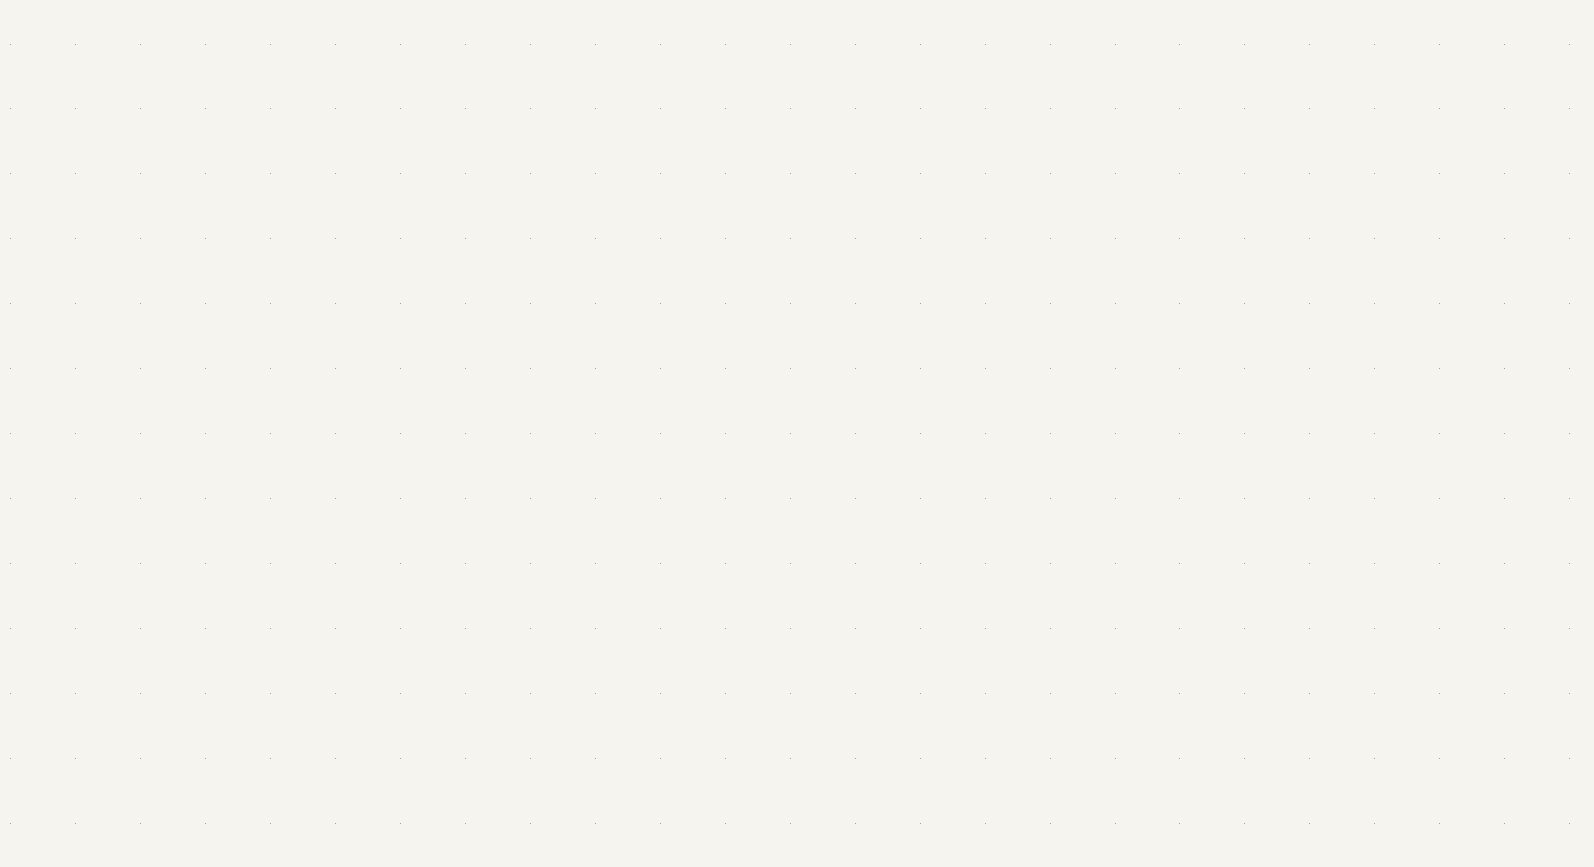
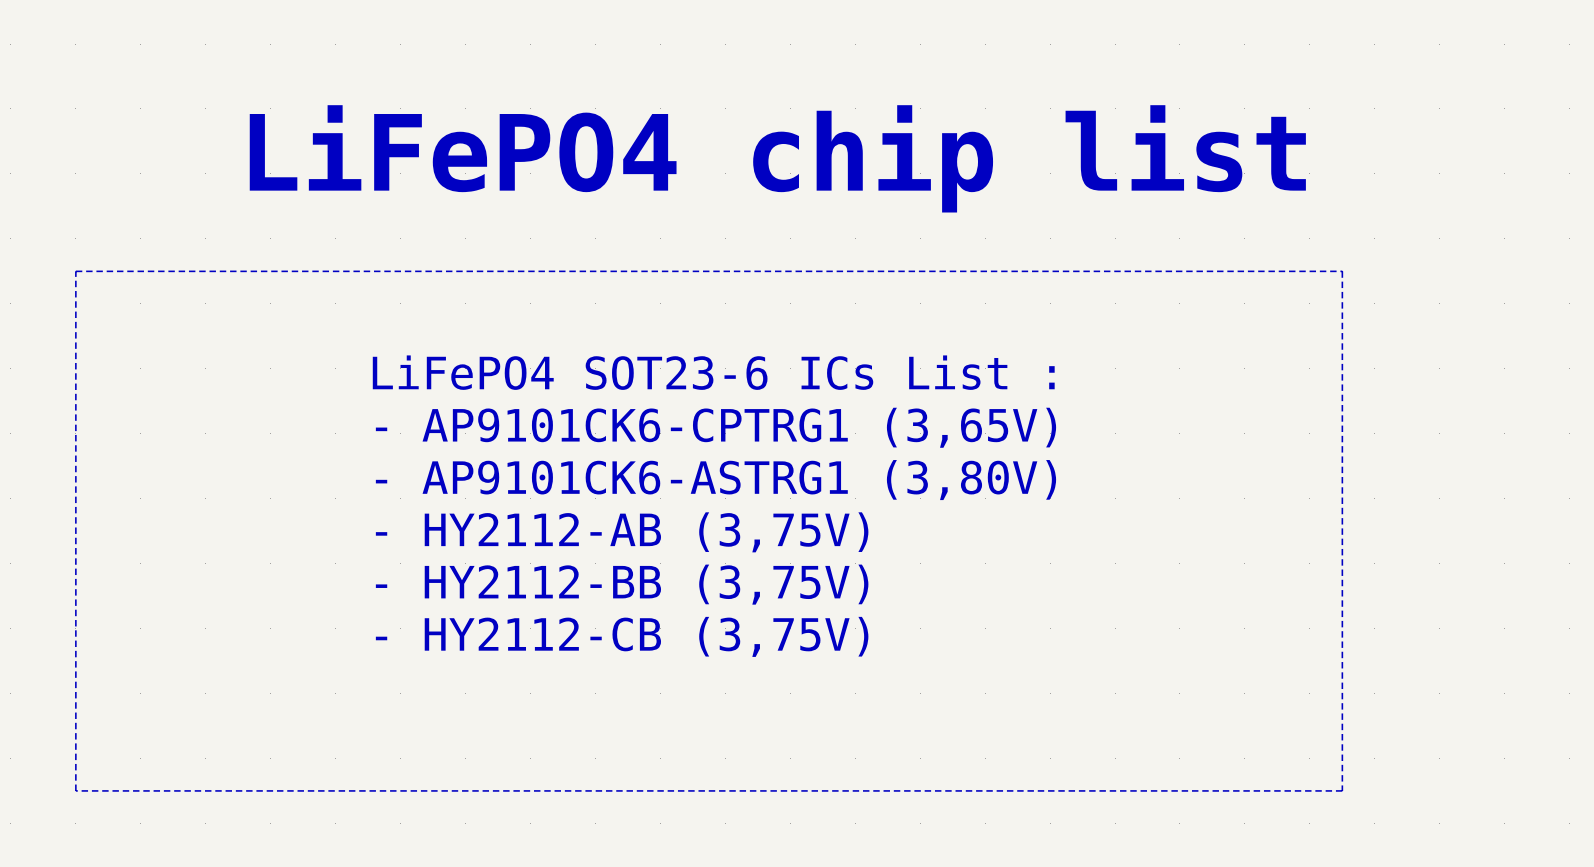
text: none -> LiFePO4 chip list (777, 158)
line: none -> (75, 271) (1342, 271) (1342, 790) (75, 790) (75, 271)
text: none -> LiFePO4 SOT23-6 ICs List : (713, 372)
text: none -> - AP9101CK6-CPTRG1 (3,65V) (715, 427)
text: none -> - AP9101CK6-ASTRG1 (3,80V) (715, 480)
text: none -> - HY2112-AB (3,75V) (622, 532)
text: none -> - HY2112-BB (3,75V) (622, 584)
text: none -> - HY2112-CB (3,75V) (622, 636)

